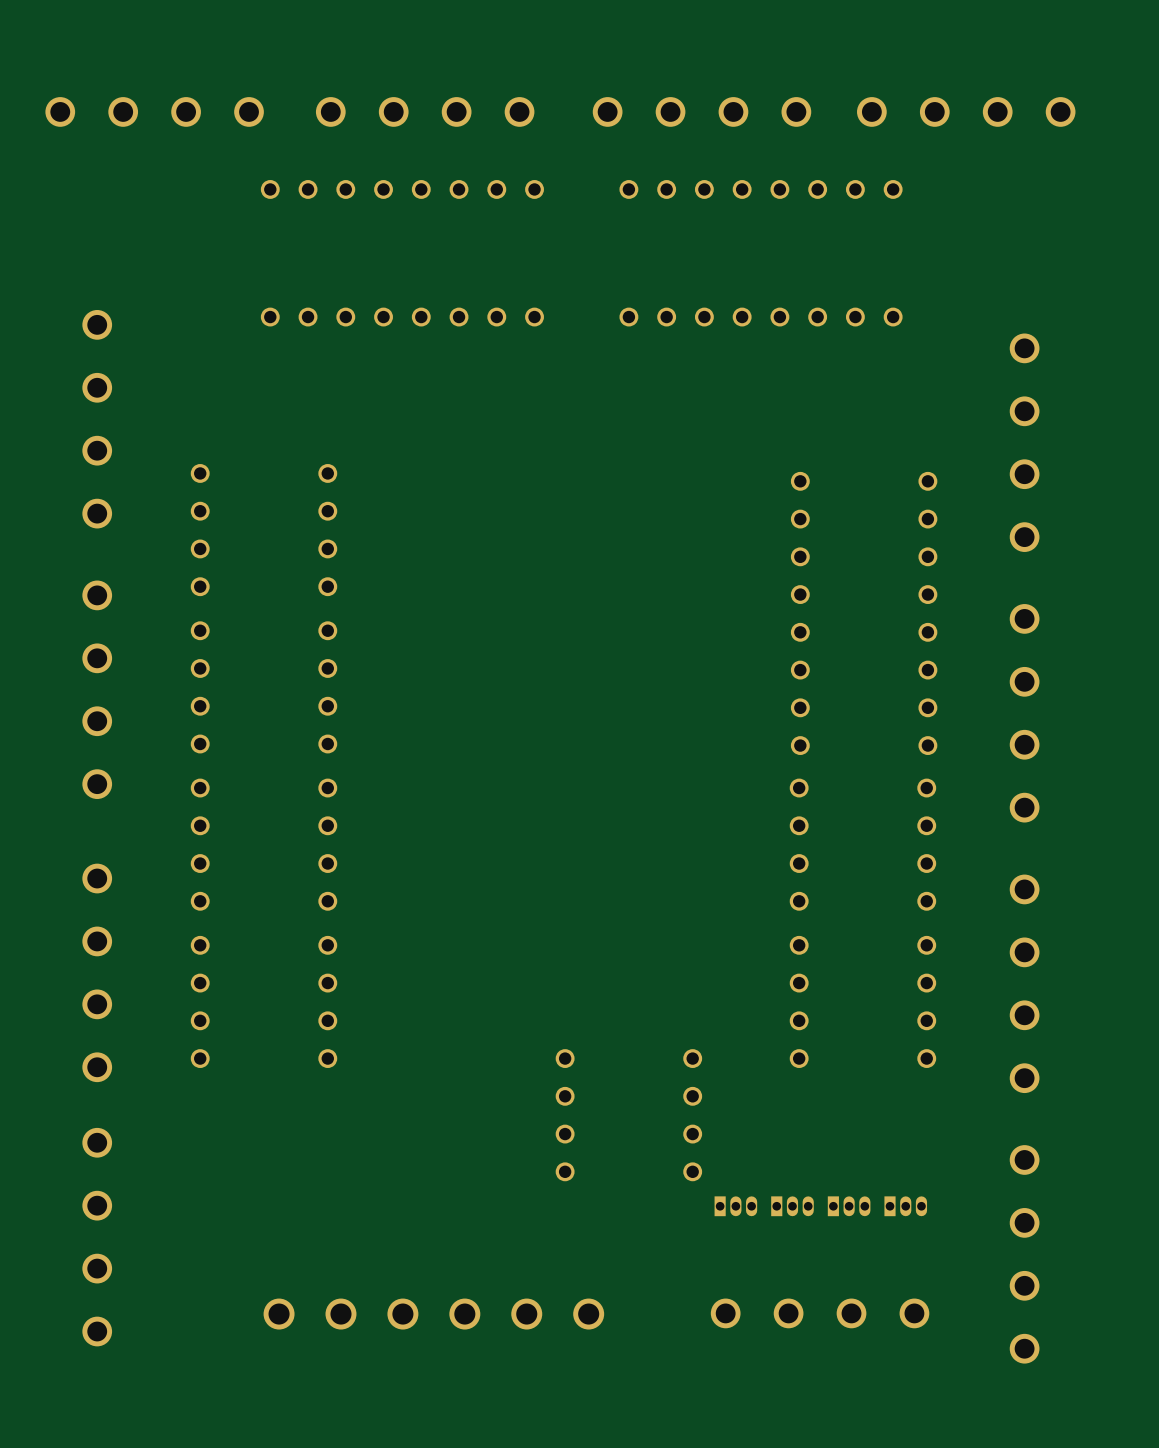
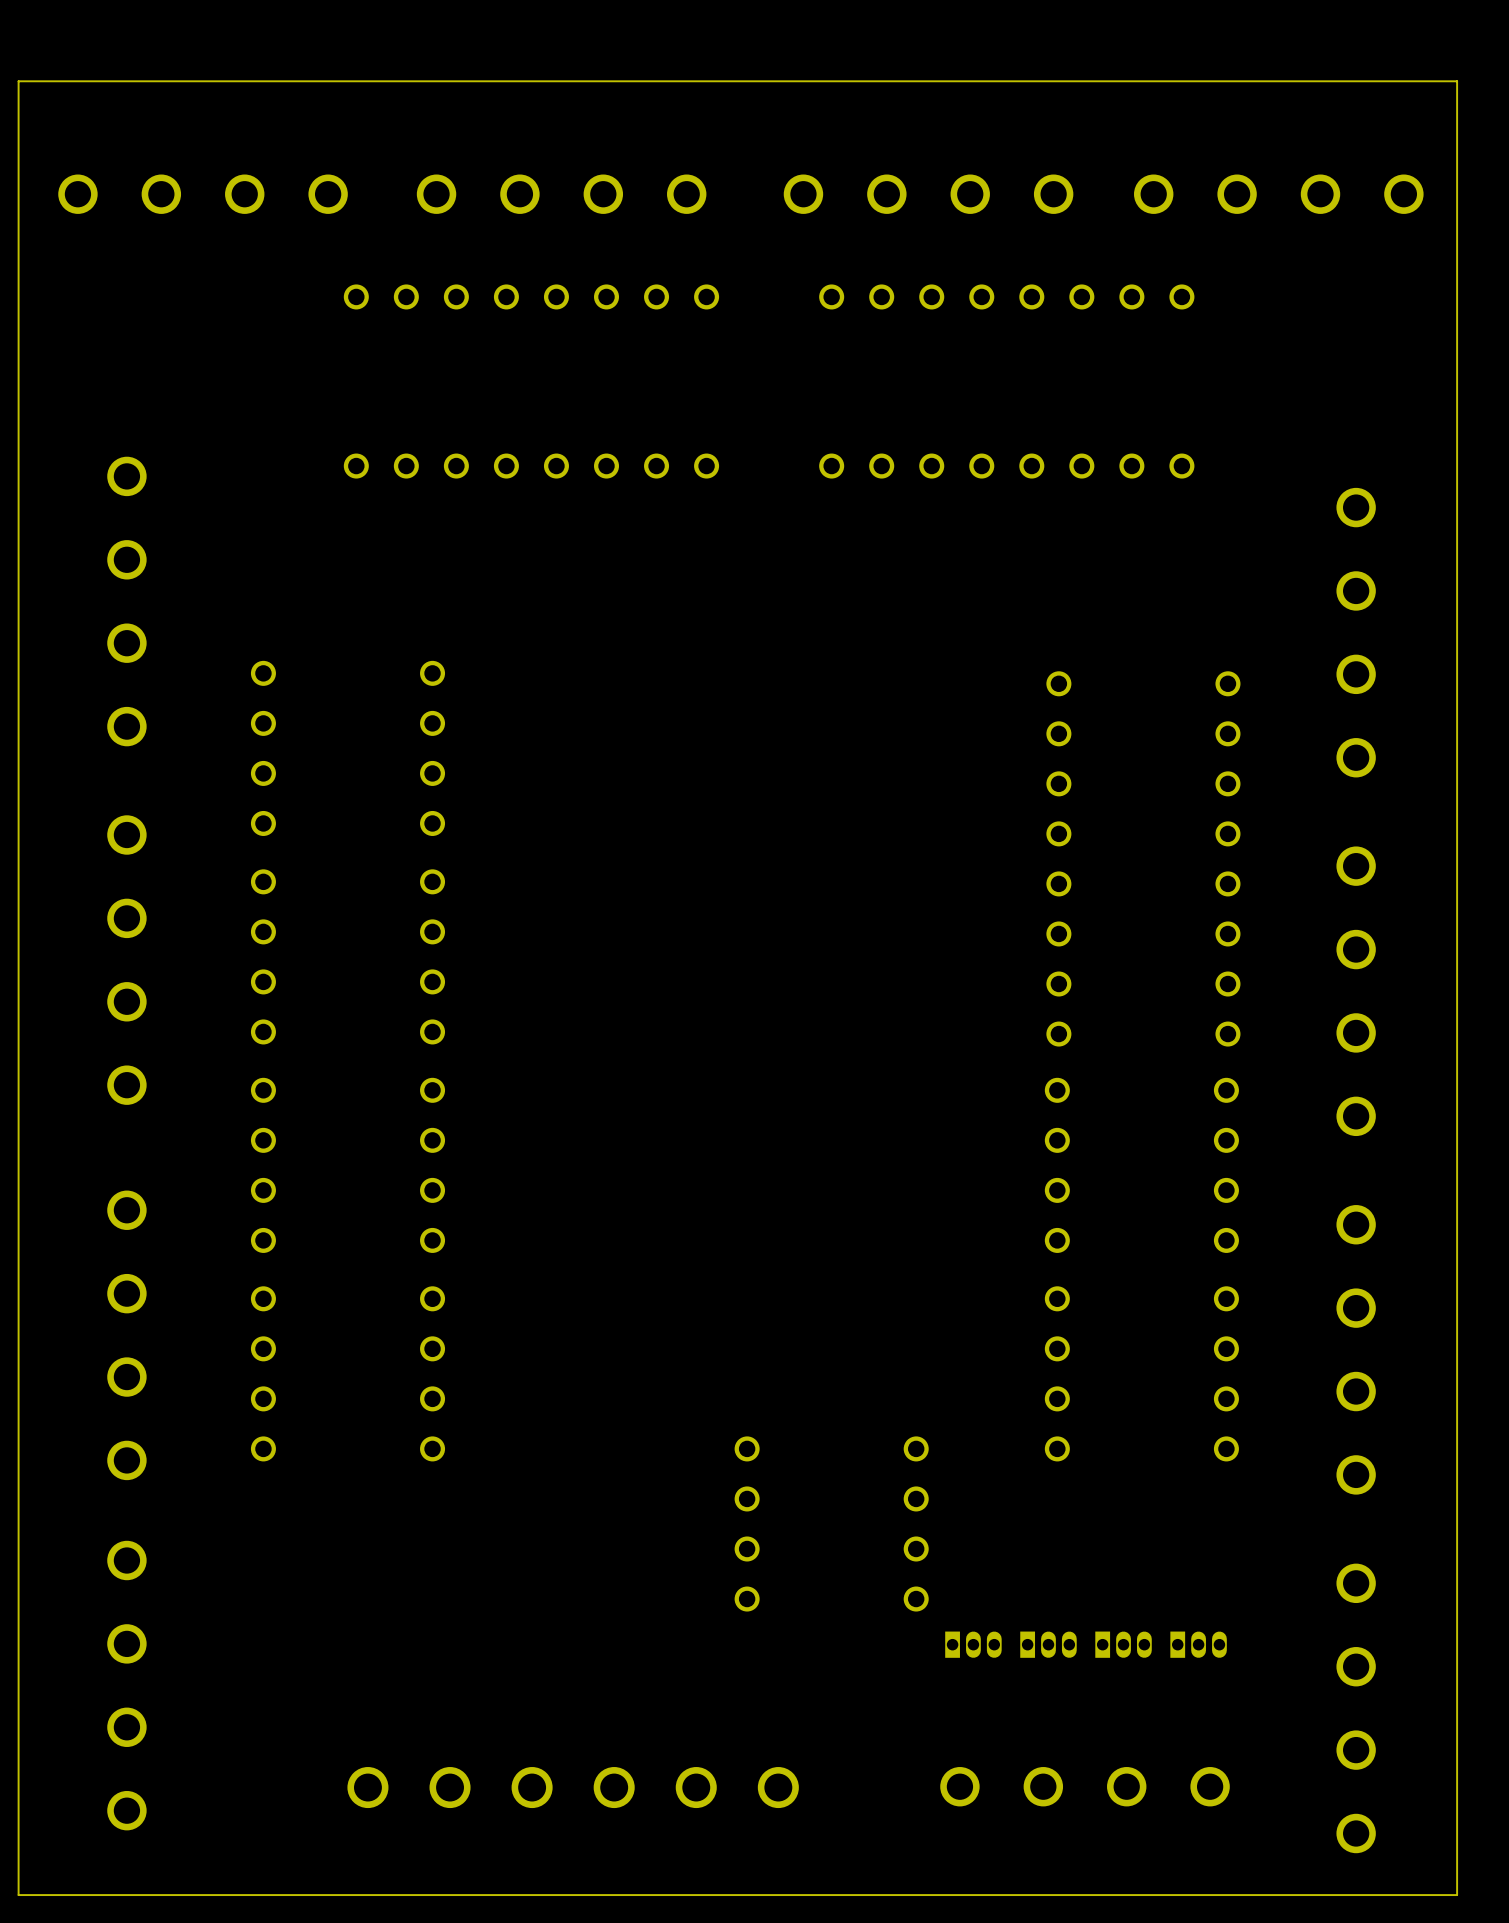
board edge: none -> (1457, 81) (1457, 1895) (18, 1895) (18, 81) (1457, 81)

